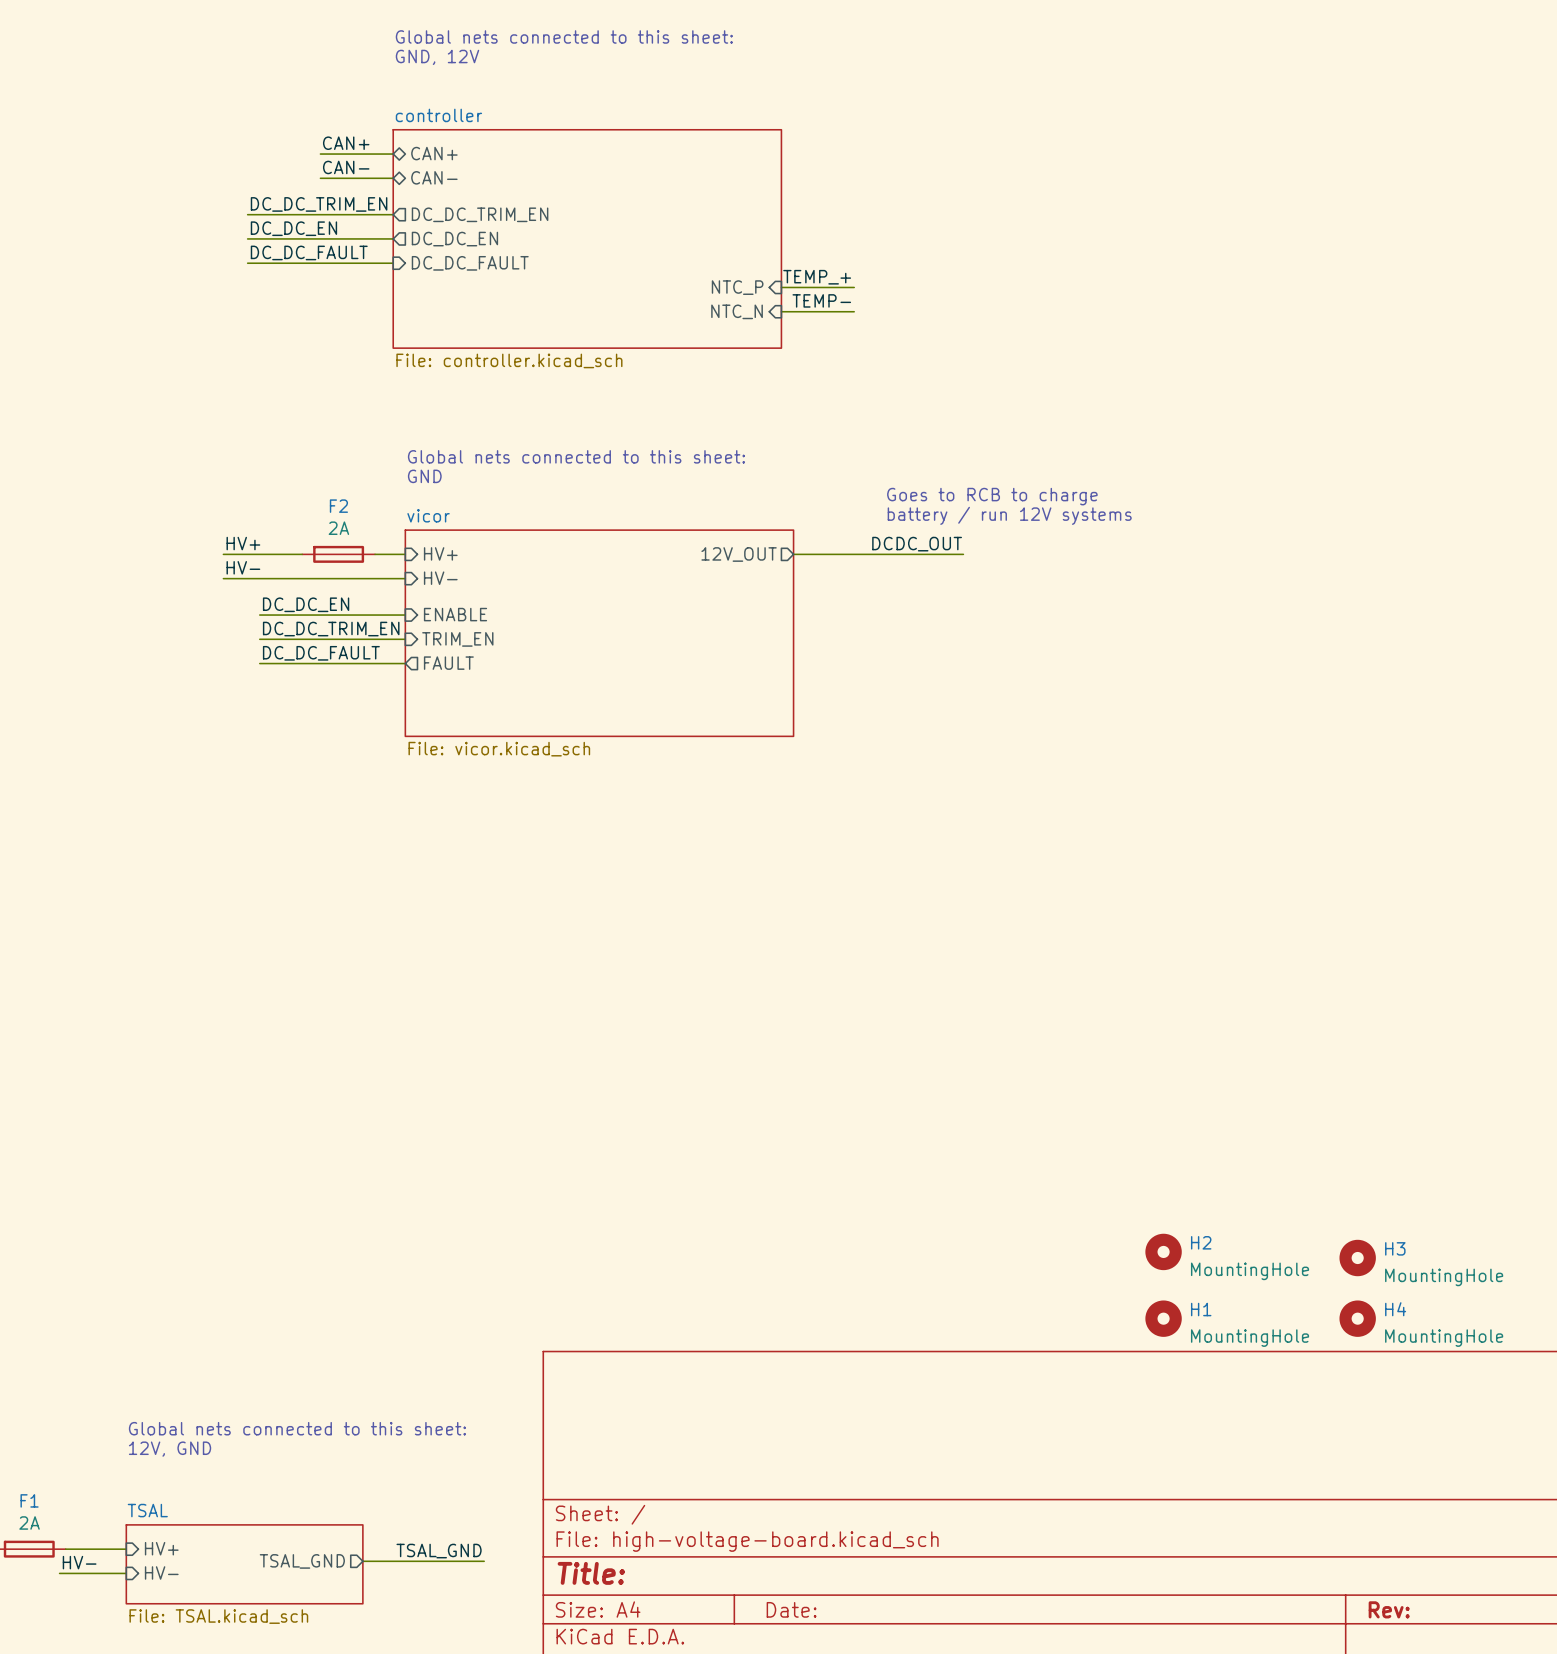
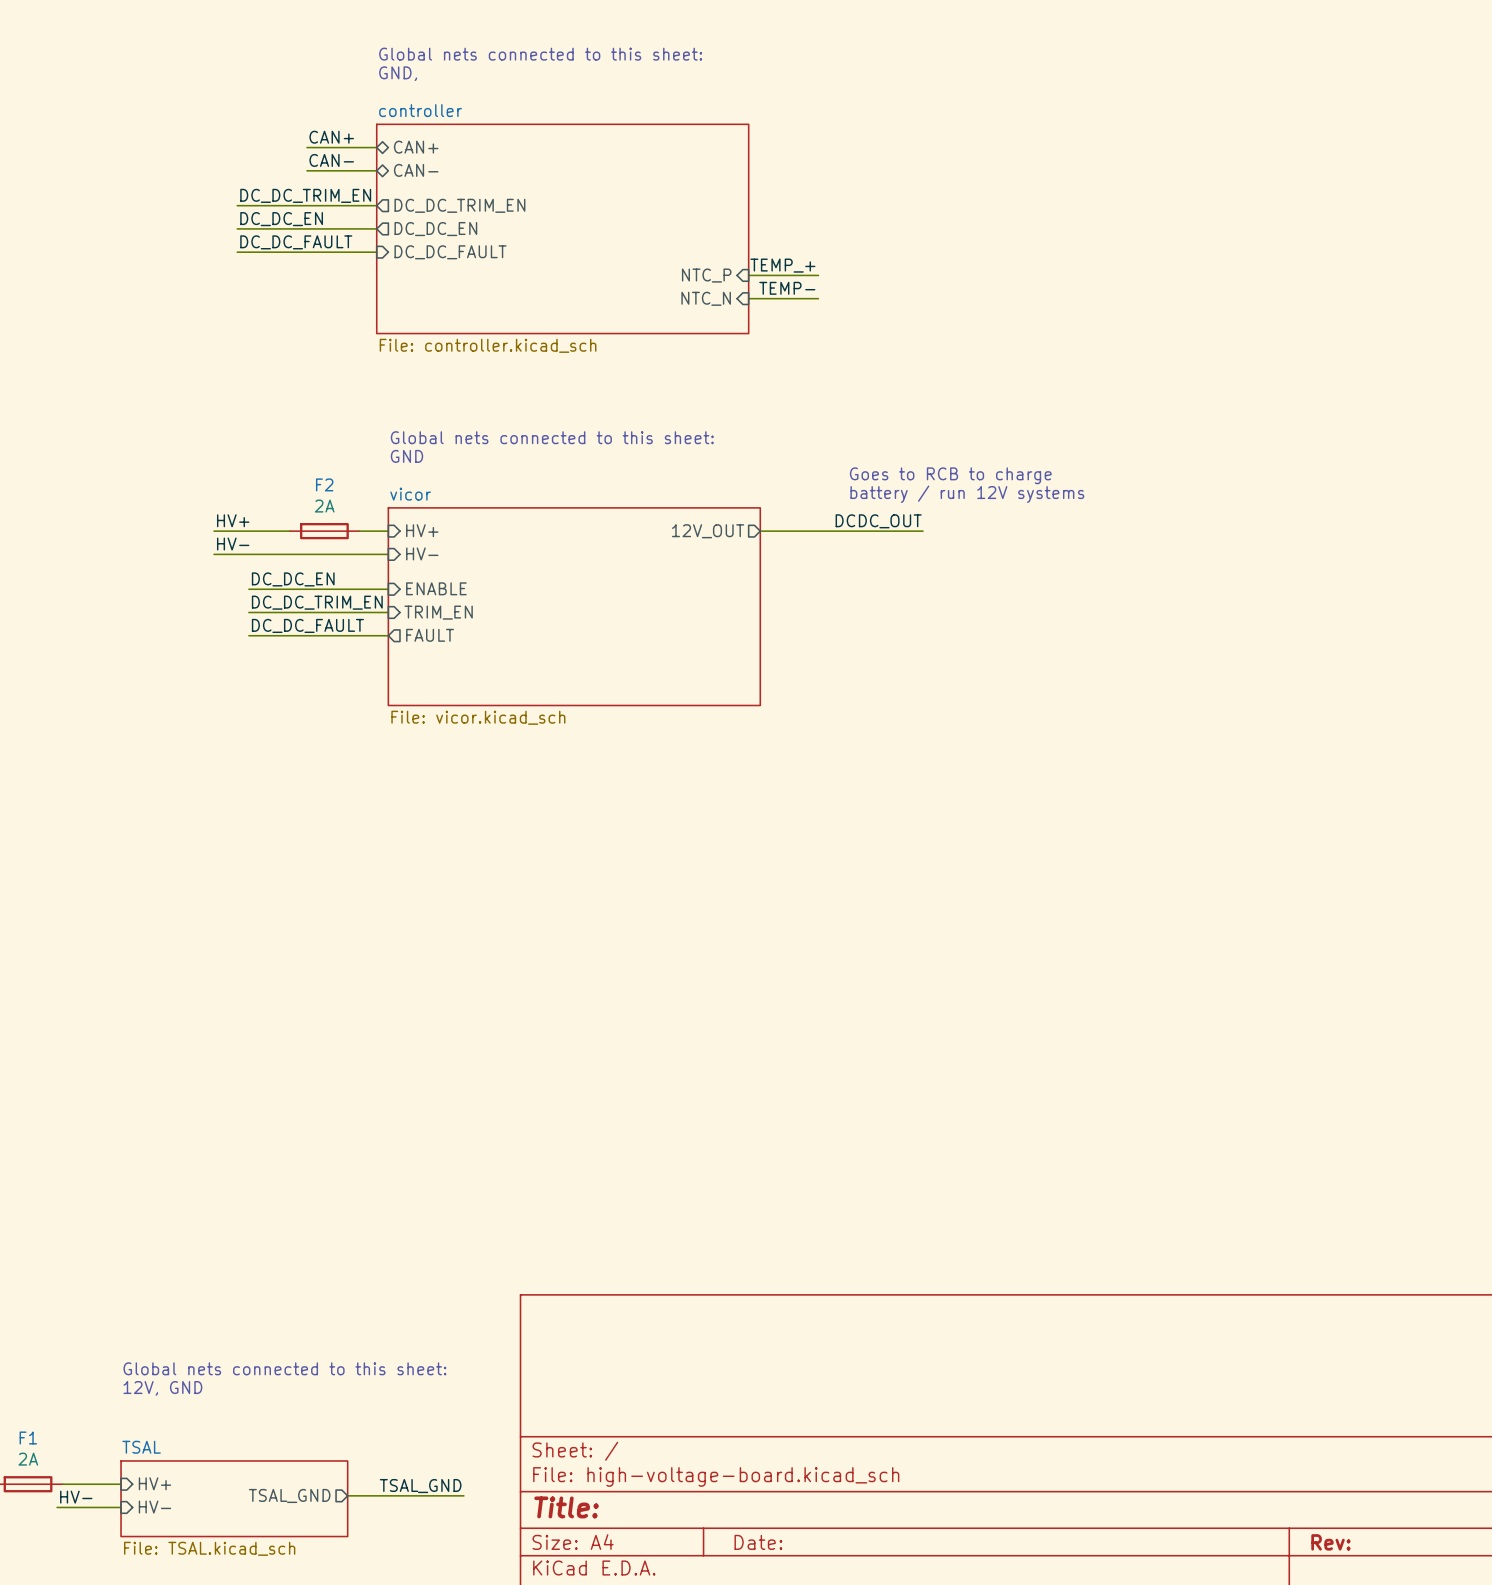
text: Global nets connected to this sheet: (564, 36) -> none
text: GND, 12V (437, 57) -> Global nets connected to this sheet: (540, 54)
text: none -> GND, (398, 73)
H2: MountingHole (1163, 1251) -> none
H3: MountingHole (1357, 1258) -> none
H1: MountingHole (1163, 1318) -> none
H4: MountingHole (1357, 1318) -> none

